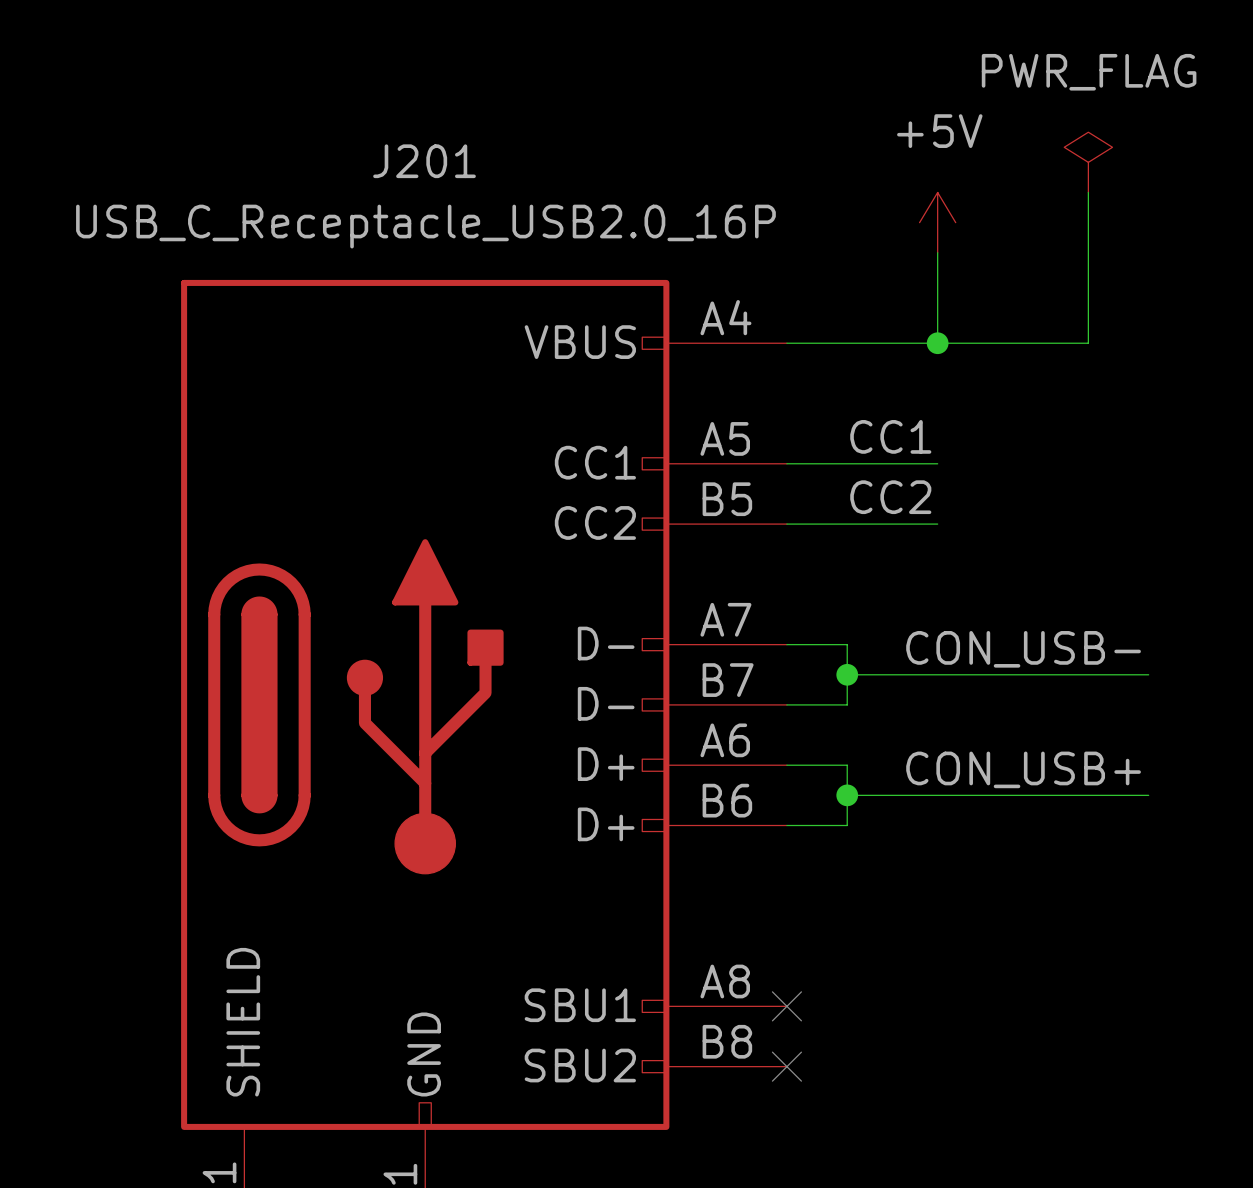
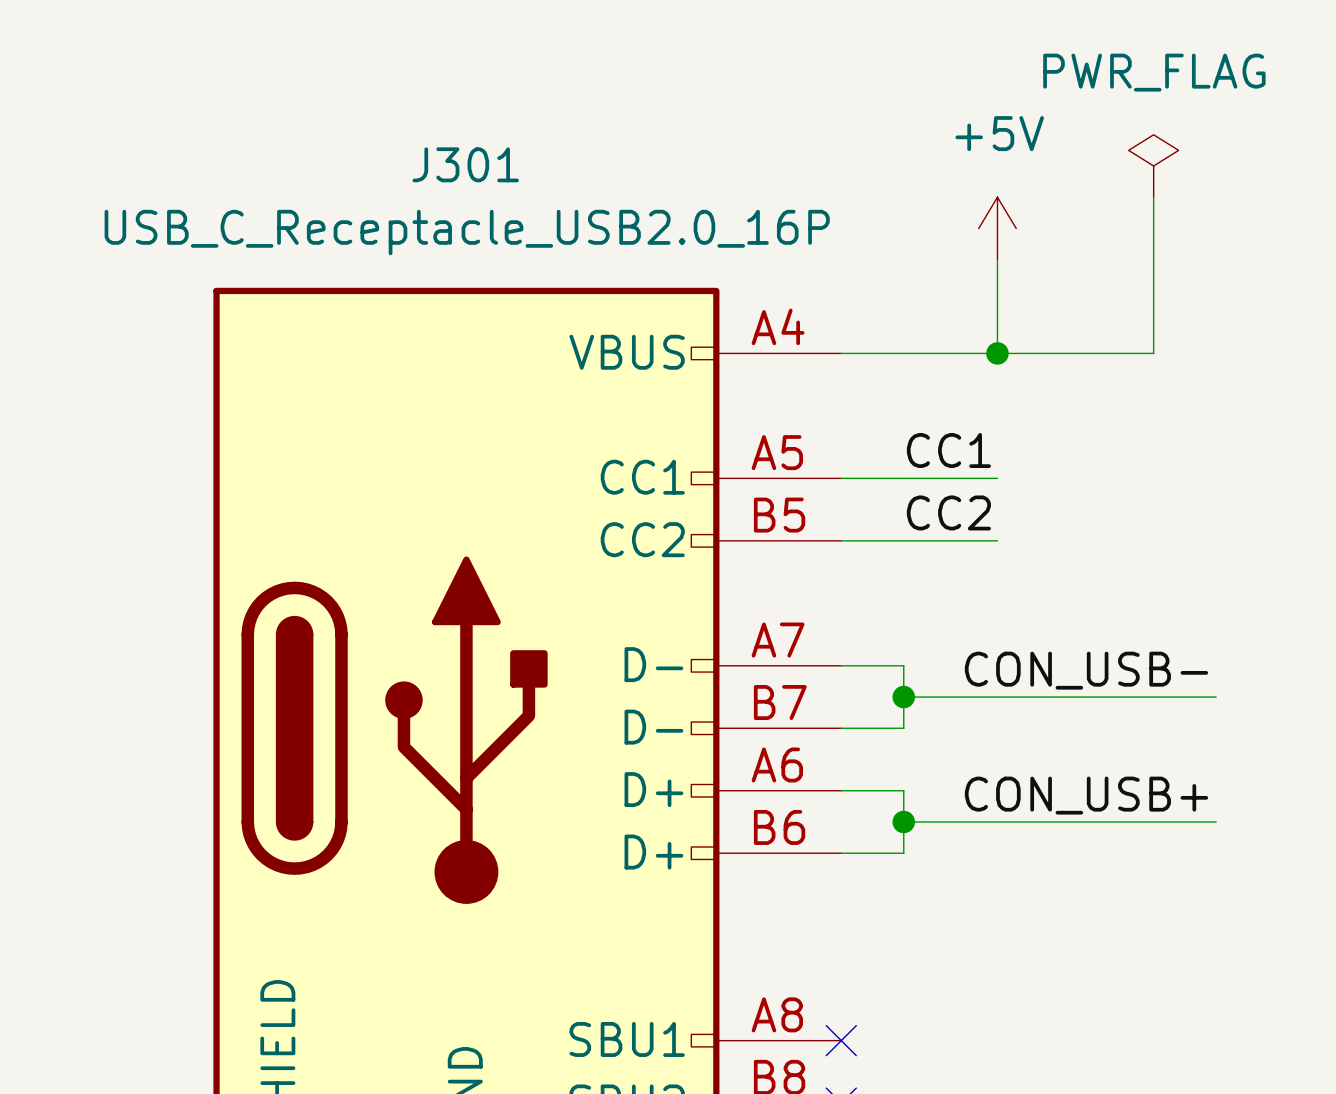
J201 name: J201 (424, 161) -> J301 (465, 164)

